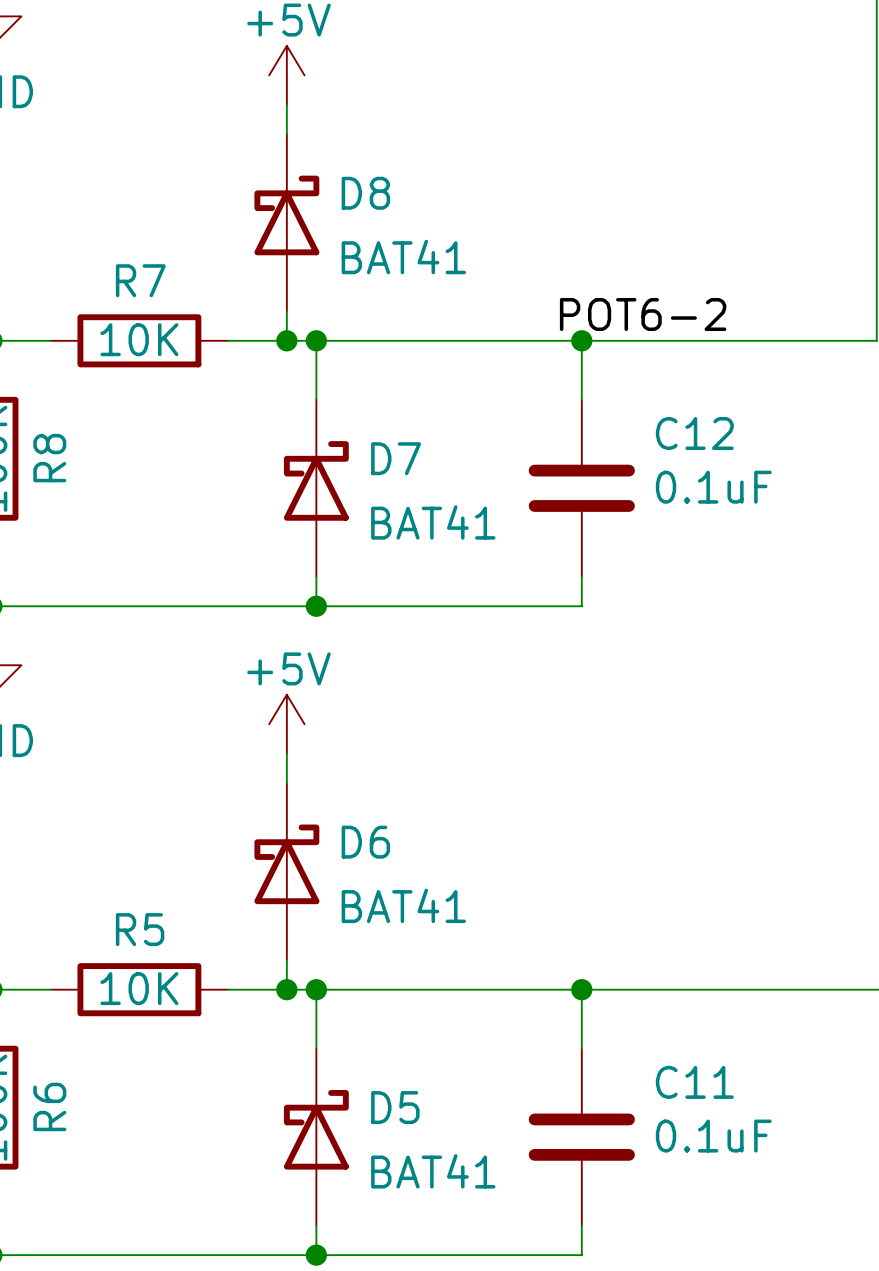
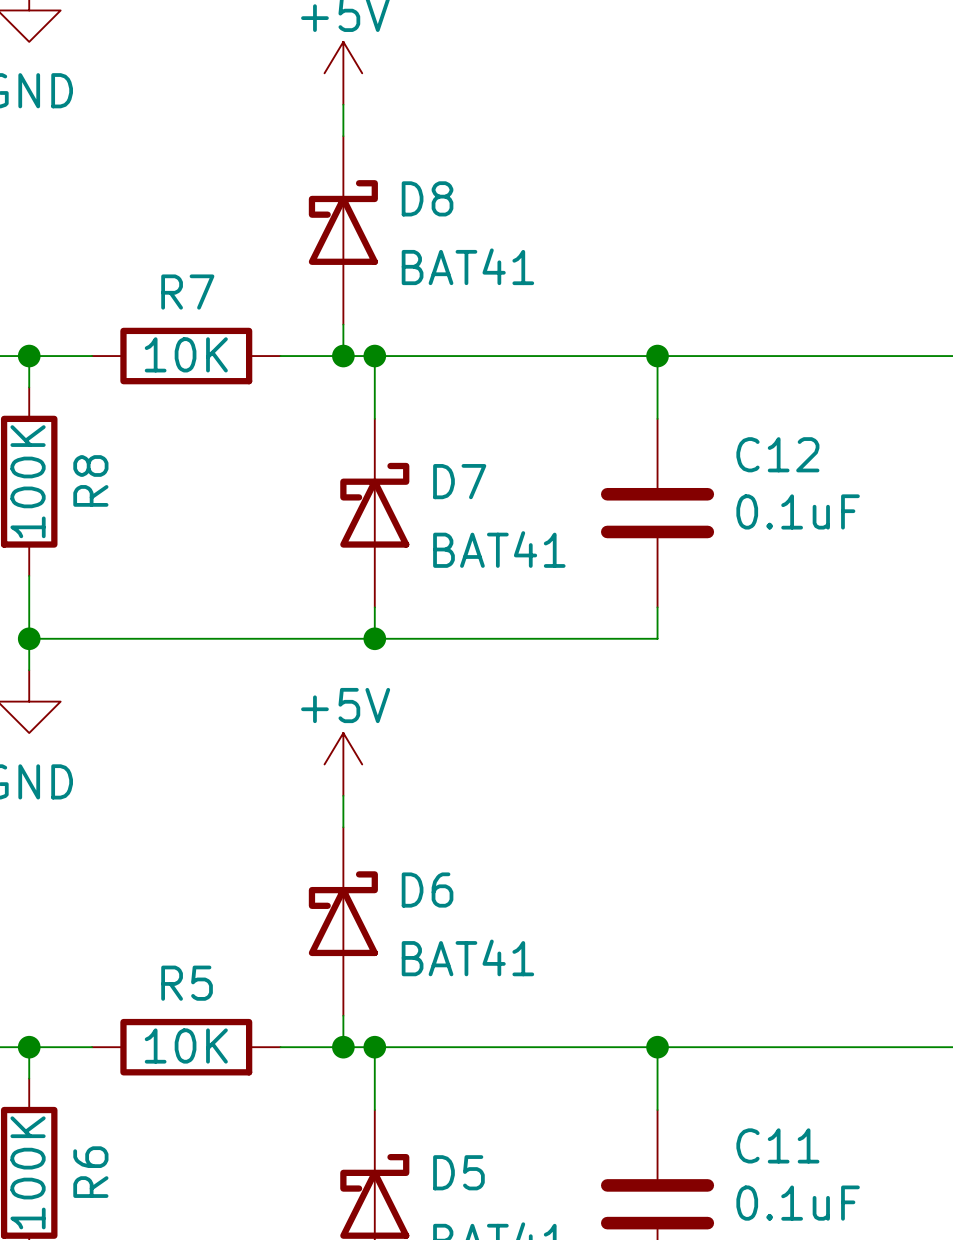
label: POT6-2 (643, 314) -> none

